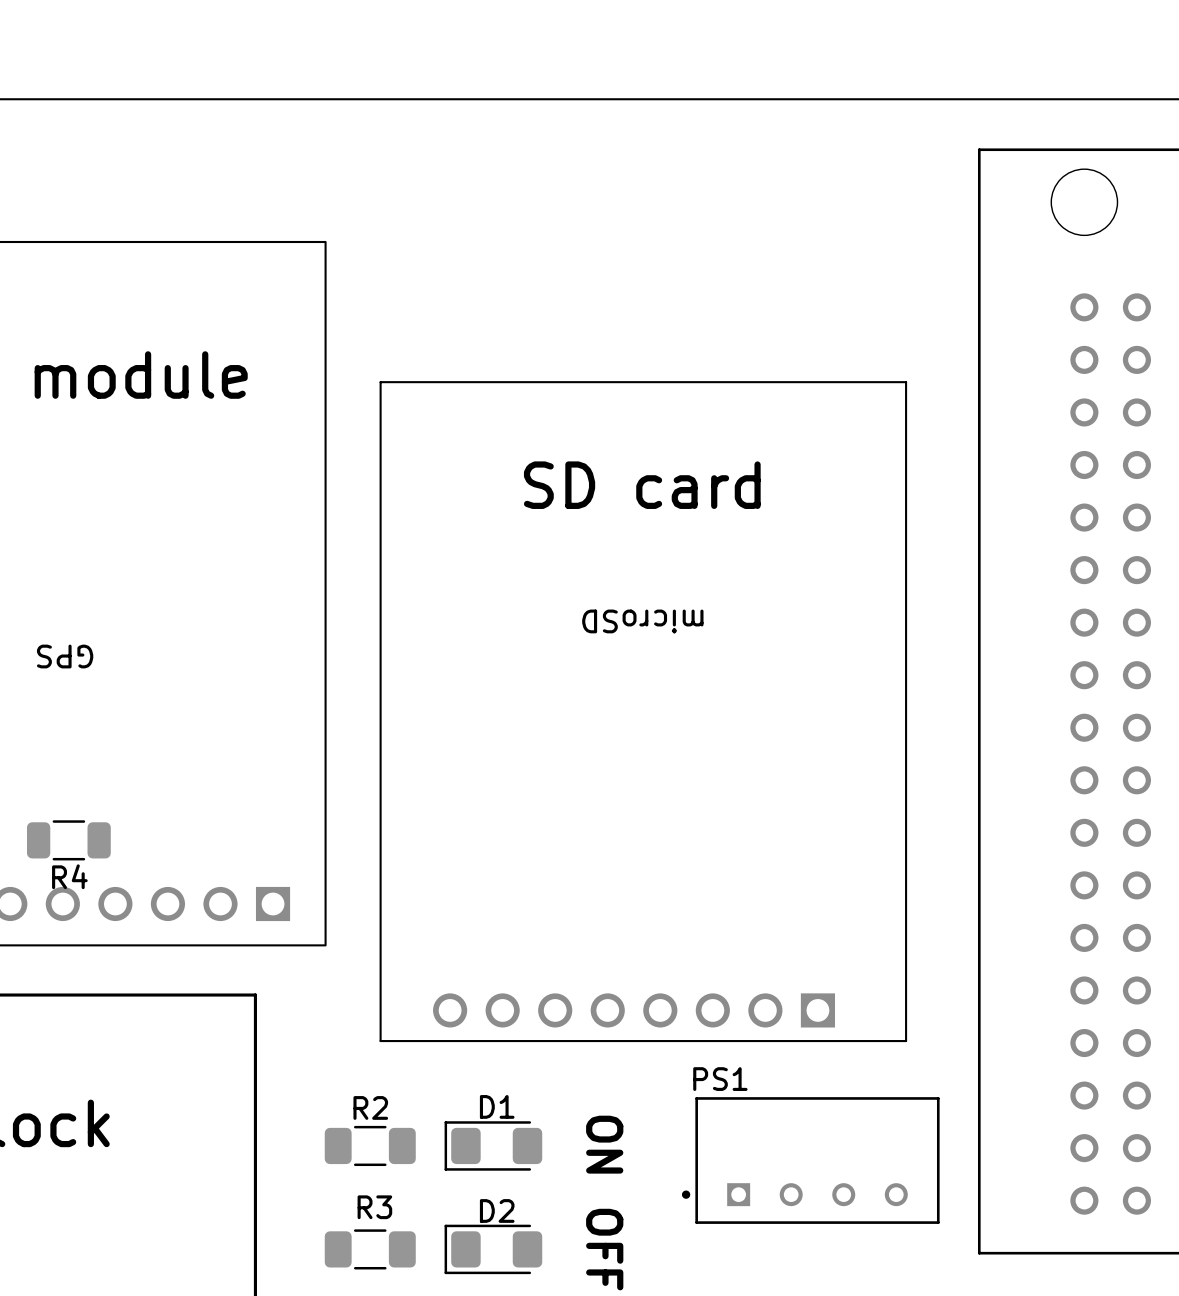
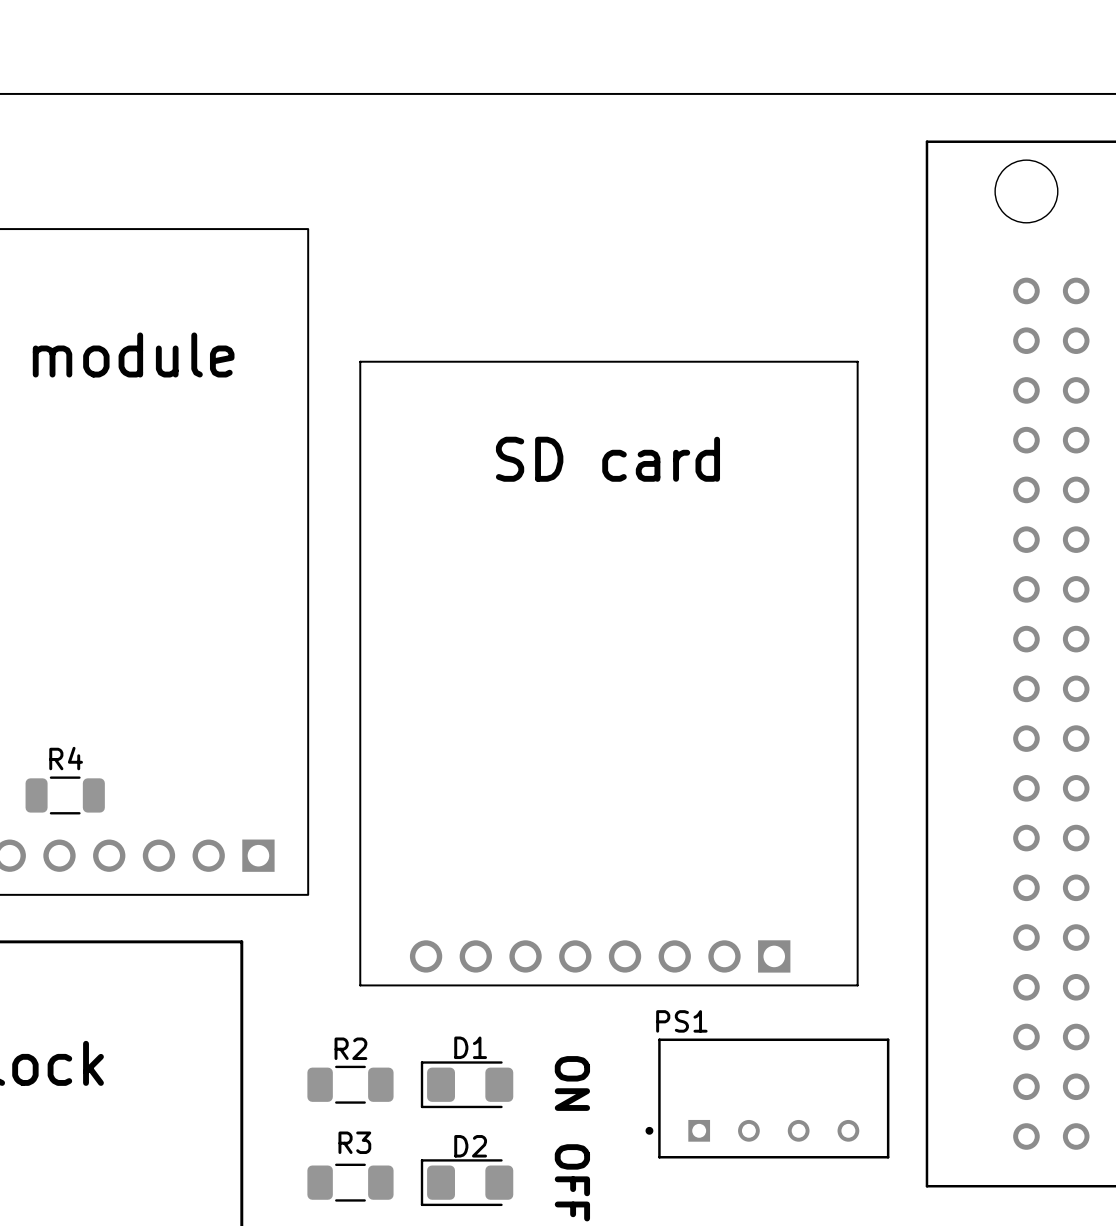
part value: microSD (642, 621) -> none
part value: GPS (65, 656) -> none
R4 name position: R4 (69, 876) -> R4 (66, 758)

